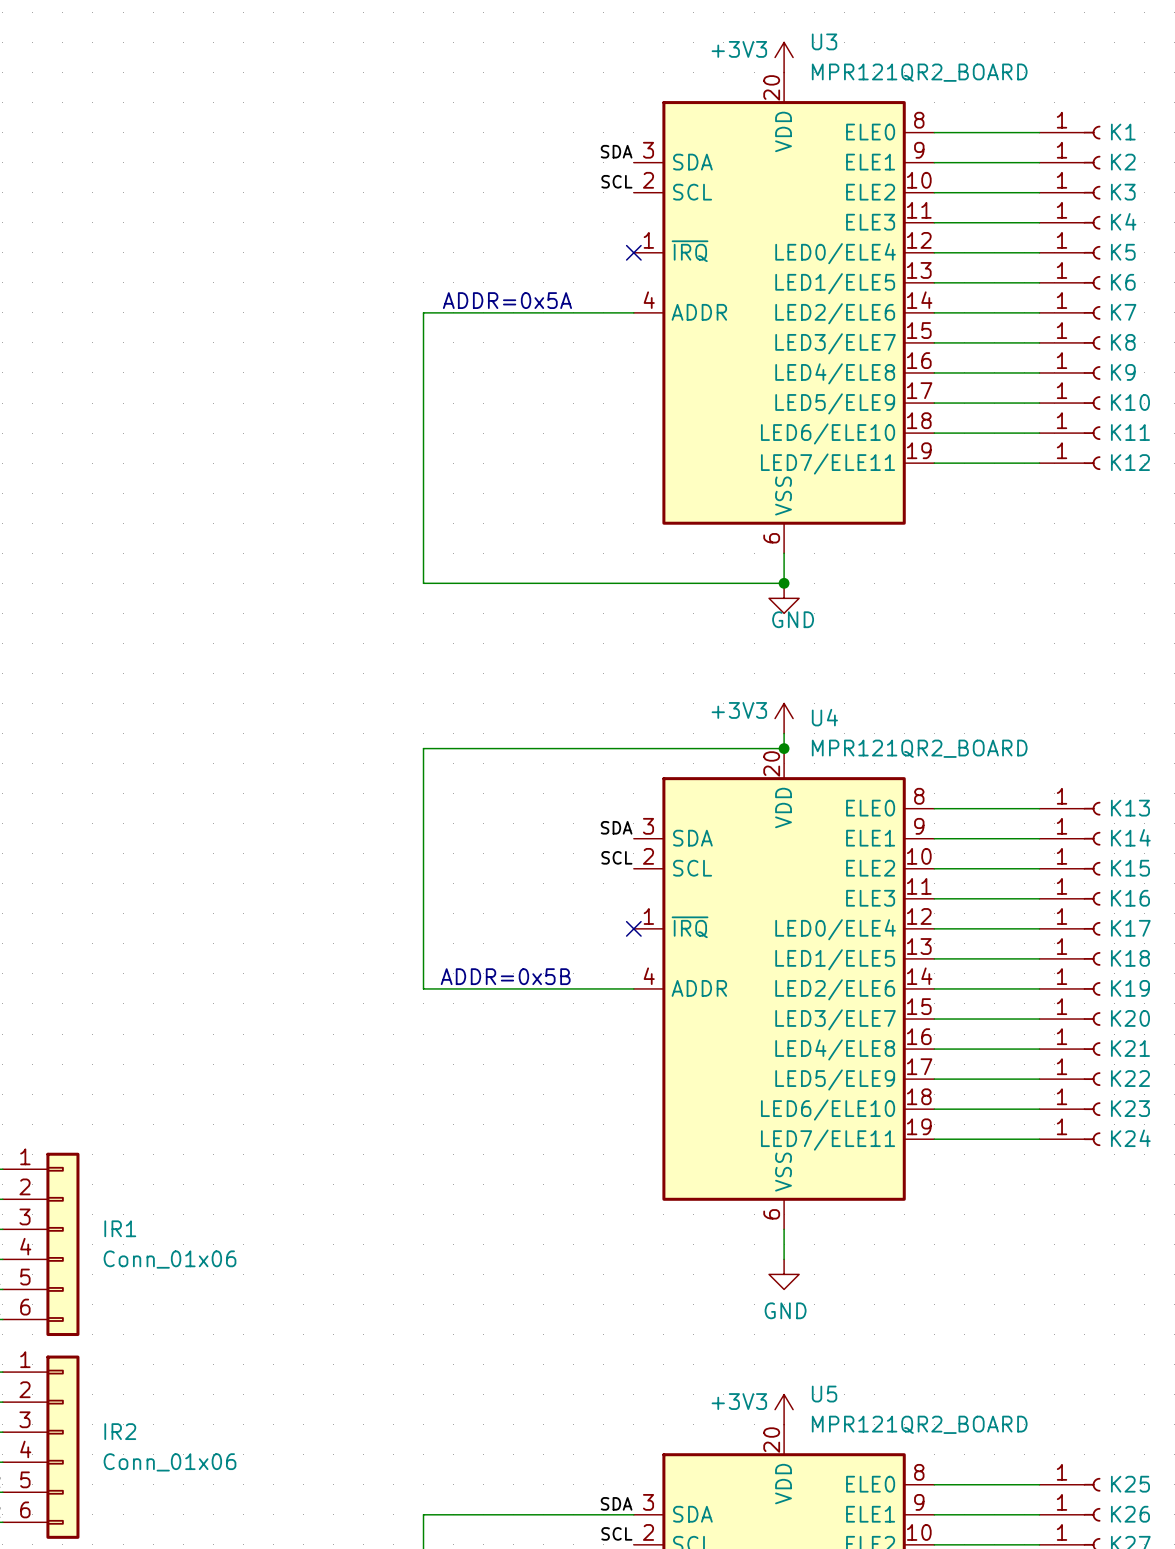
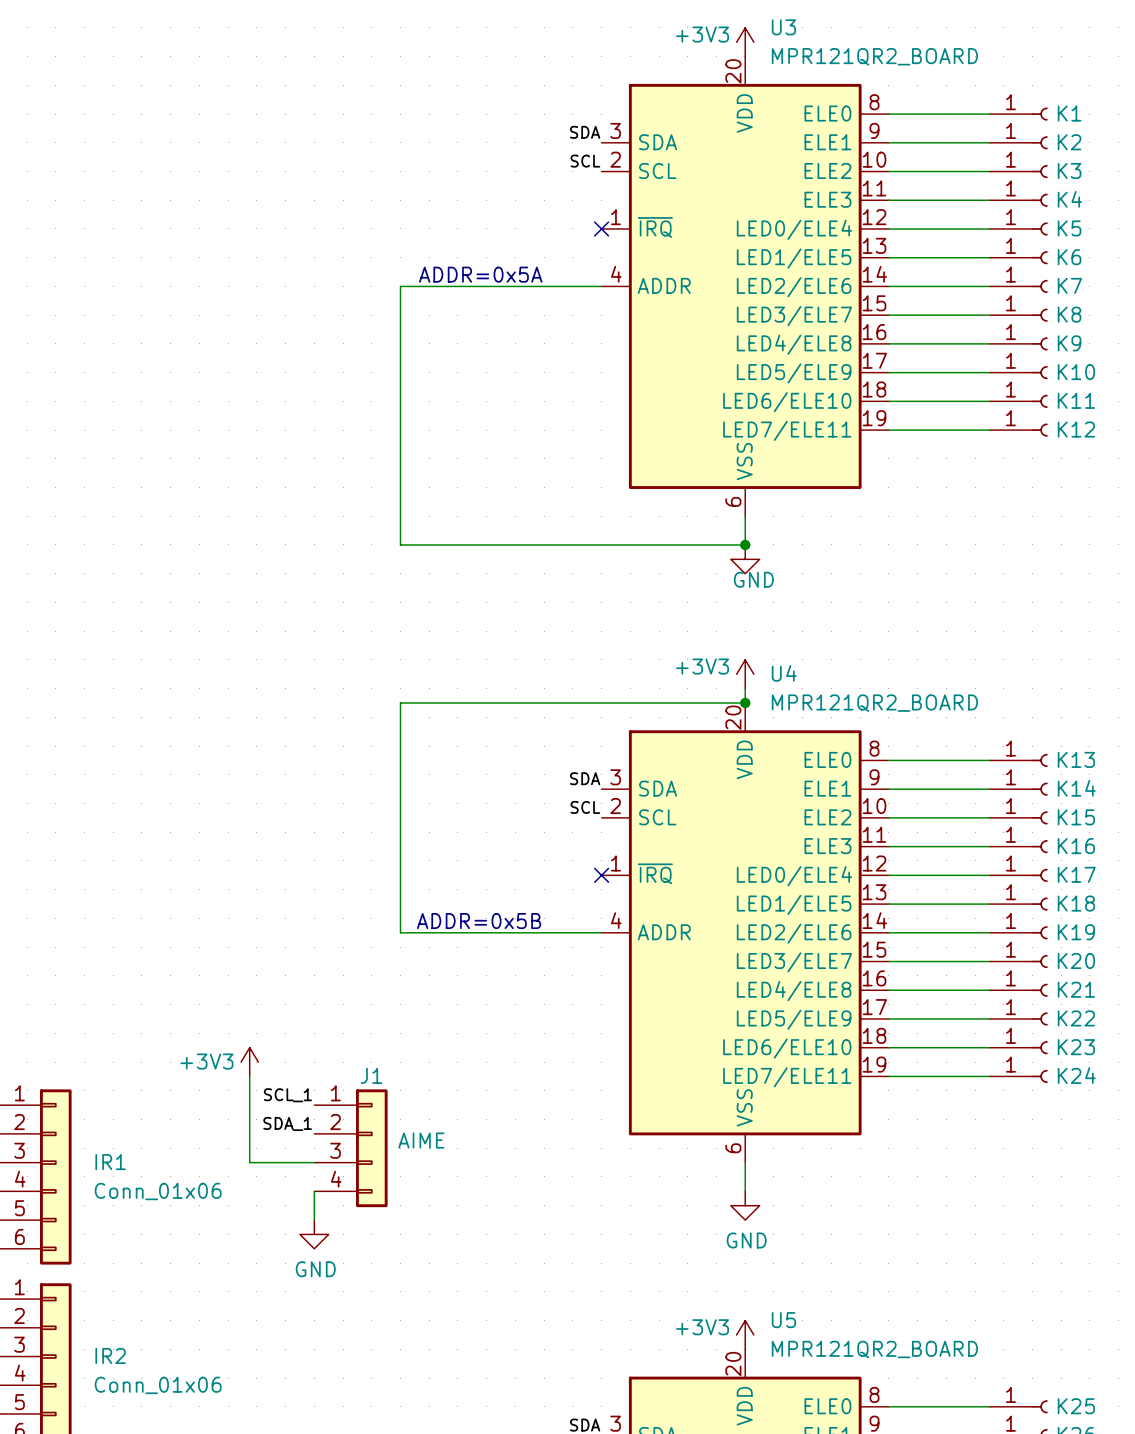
power symbol: none -> +3V3 (249, 1062)
wire: none -> (249, 1076) (249, 1162) (314, 1162)
label: none -> SCL_1 (287, 1095)
label: none -> SDA_1 (287, 1123)
J1: none -> (350, 1148)
wire: none -> (314, 1191) (314, 1220)
power symbol: none -> GND (314, 1234)

